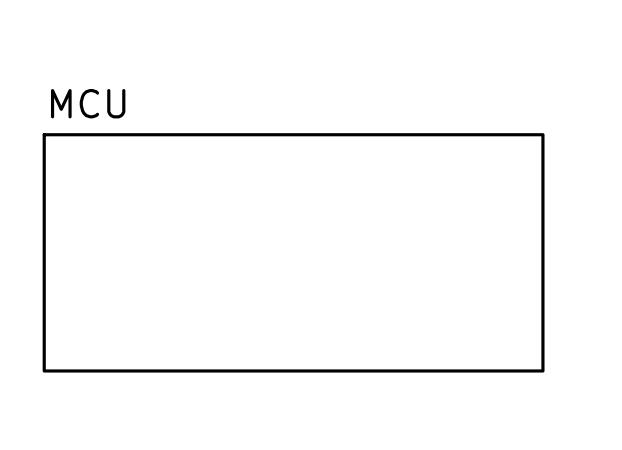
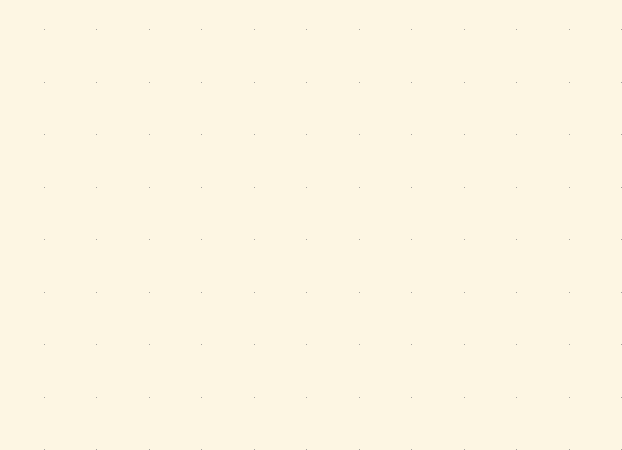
sheet MCU: (293, 252) -> none

